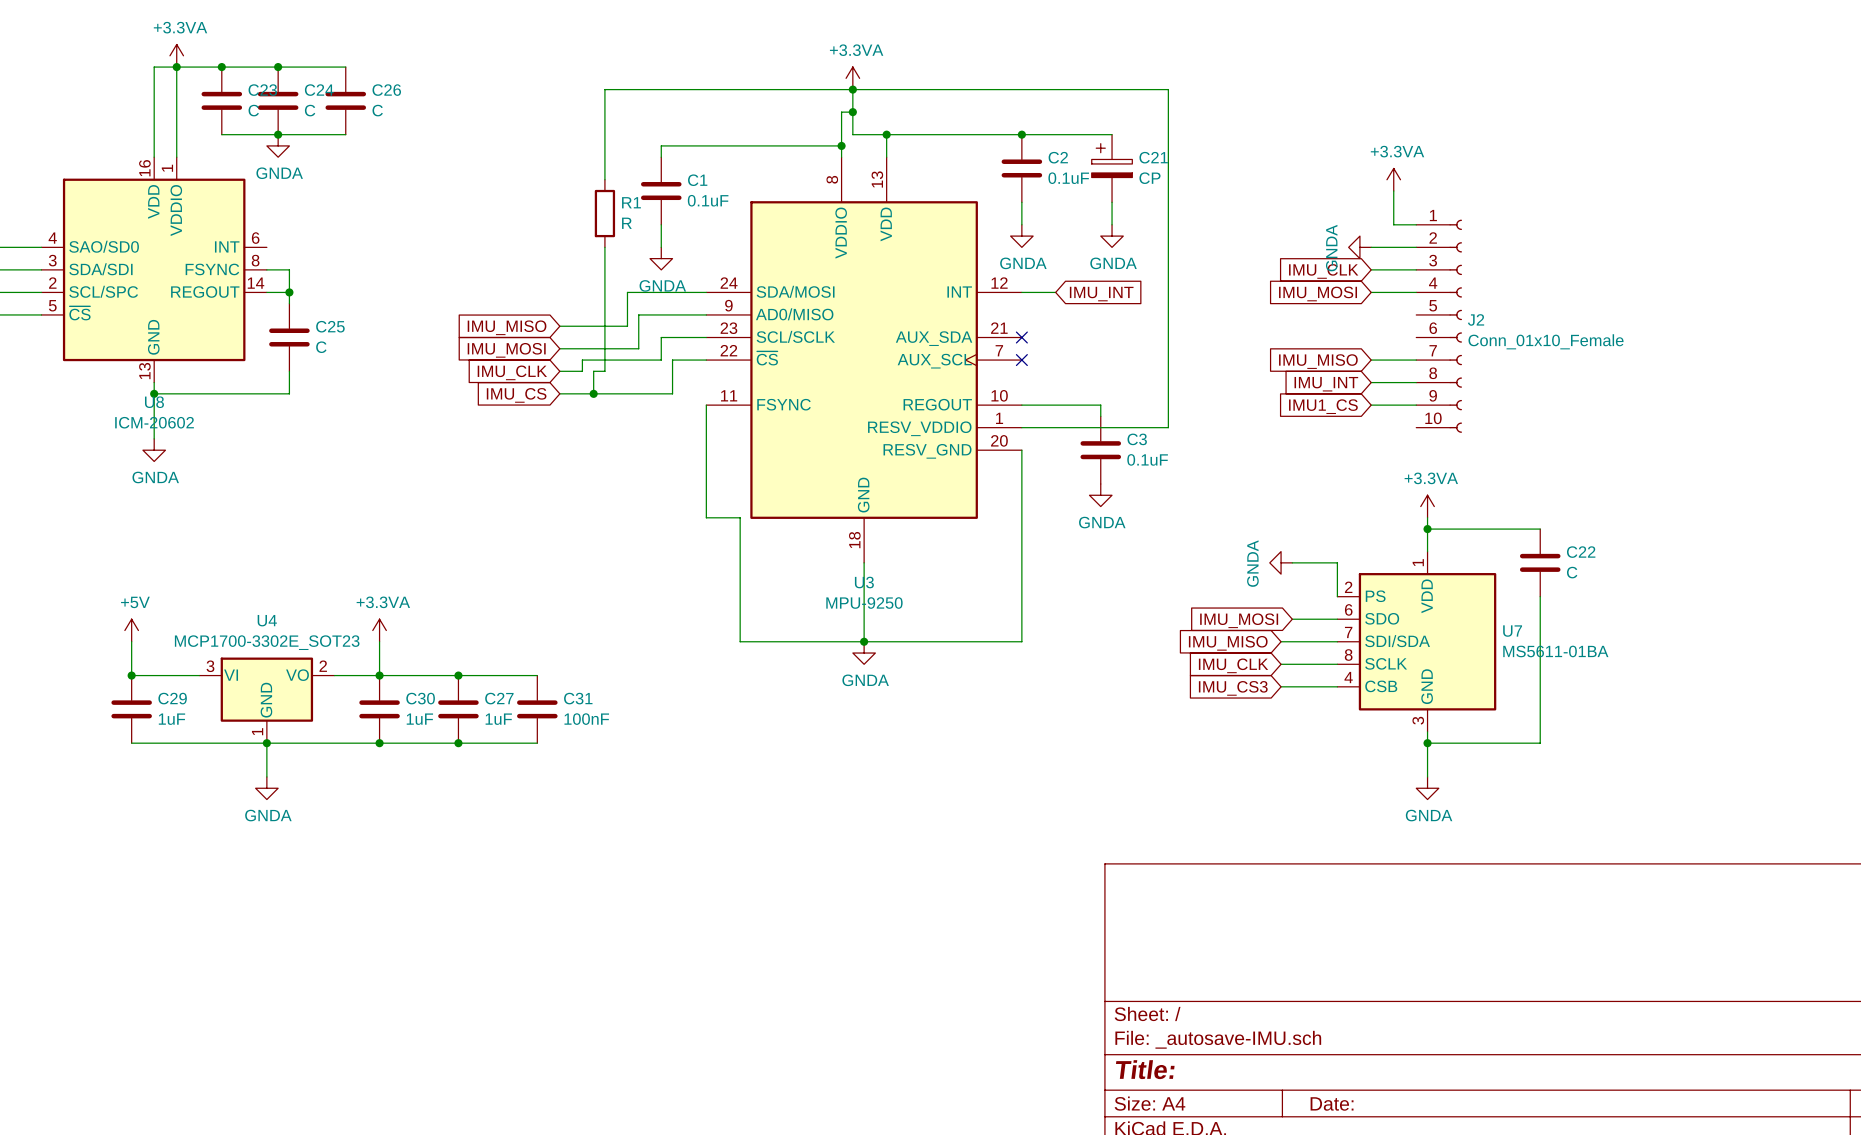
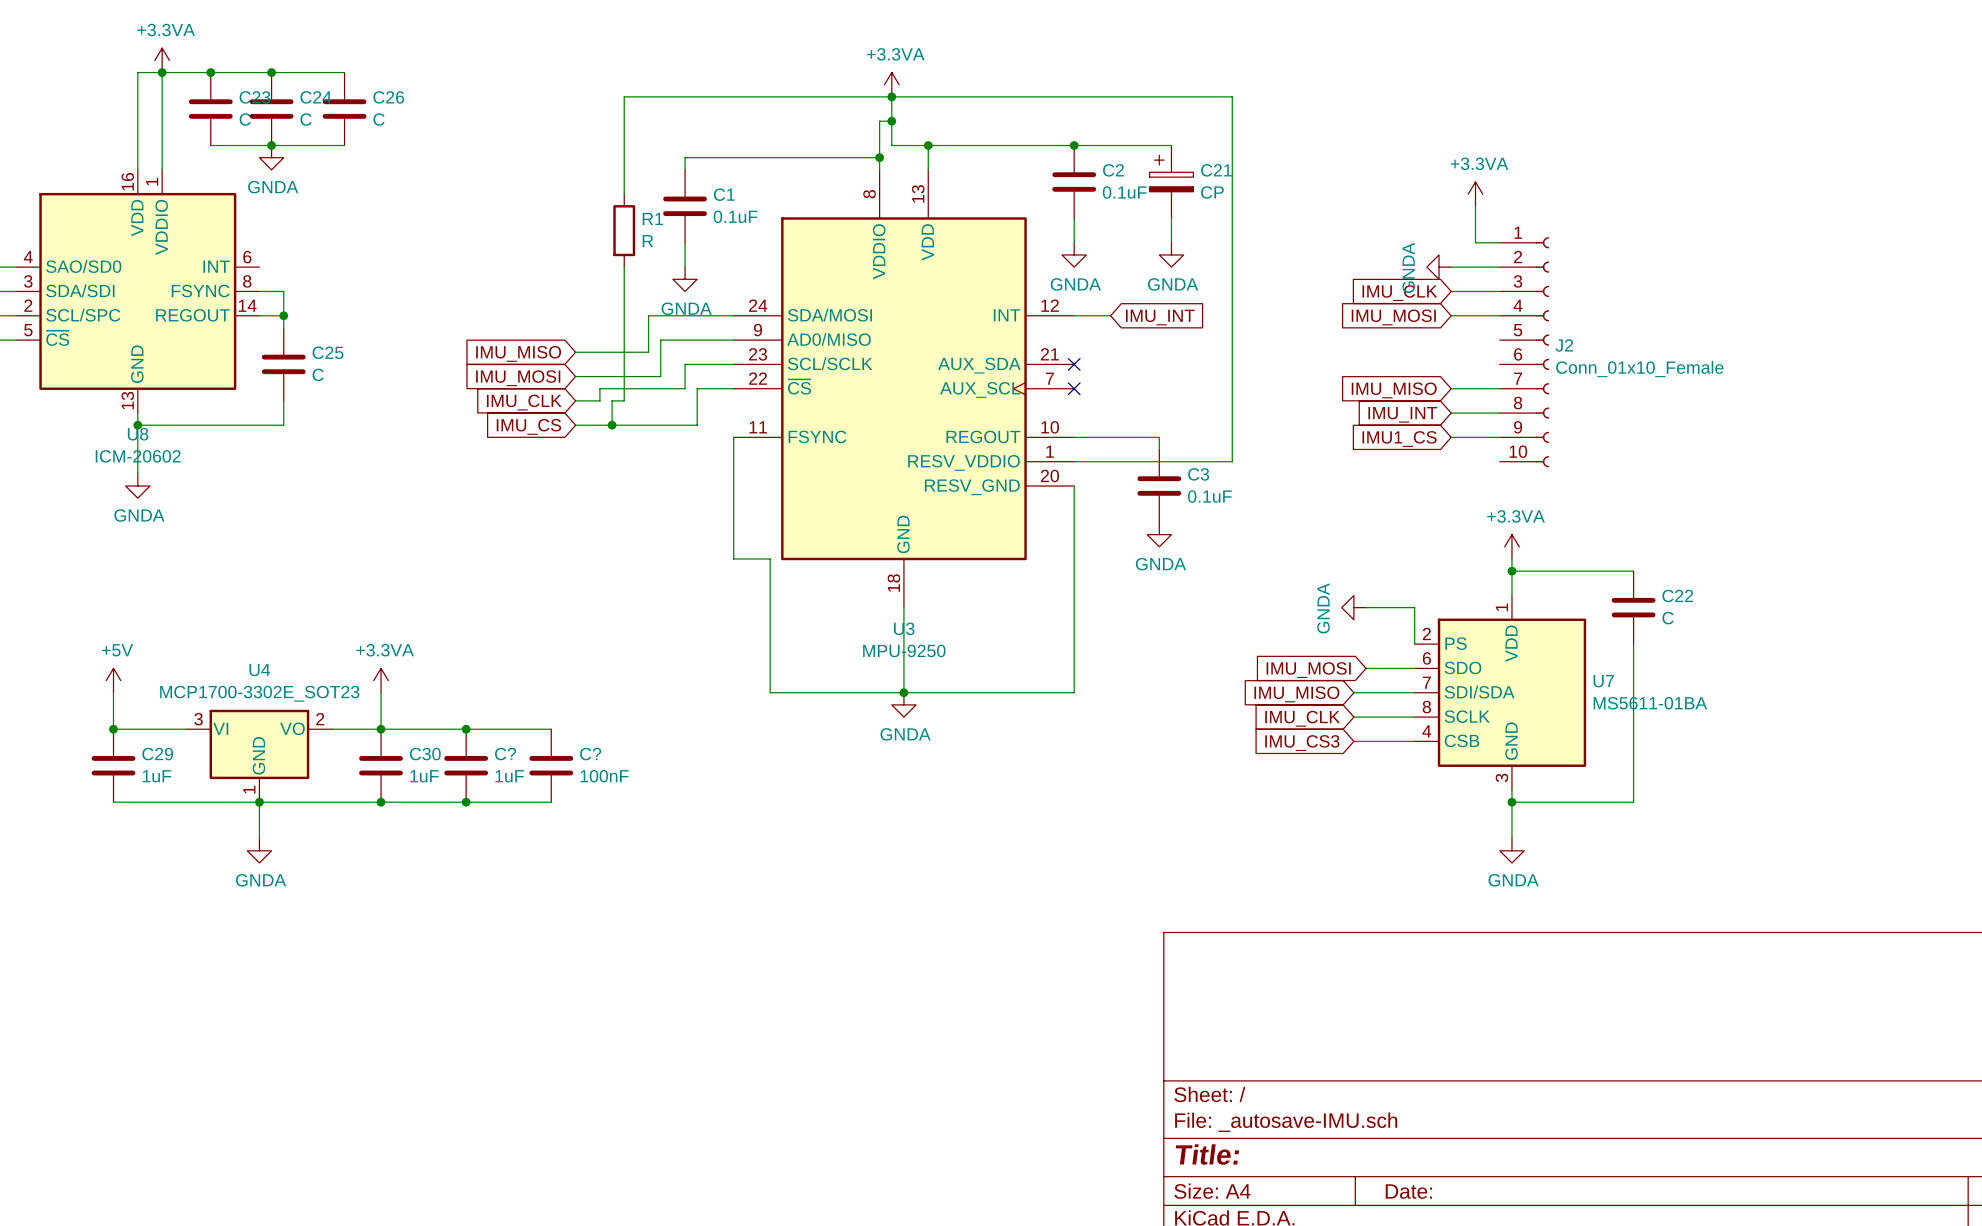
C27 name: C27 (499, 698) -> C? (505, 754)
C31 name: C31 (578, 698) -> C? (590, 754)

